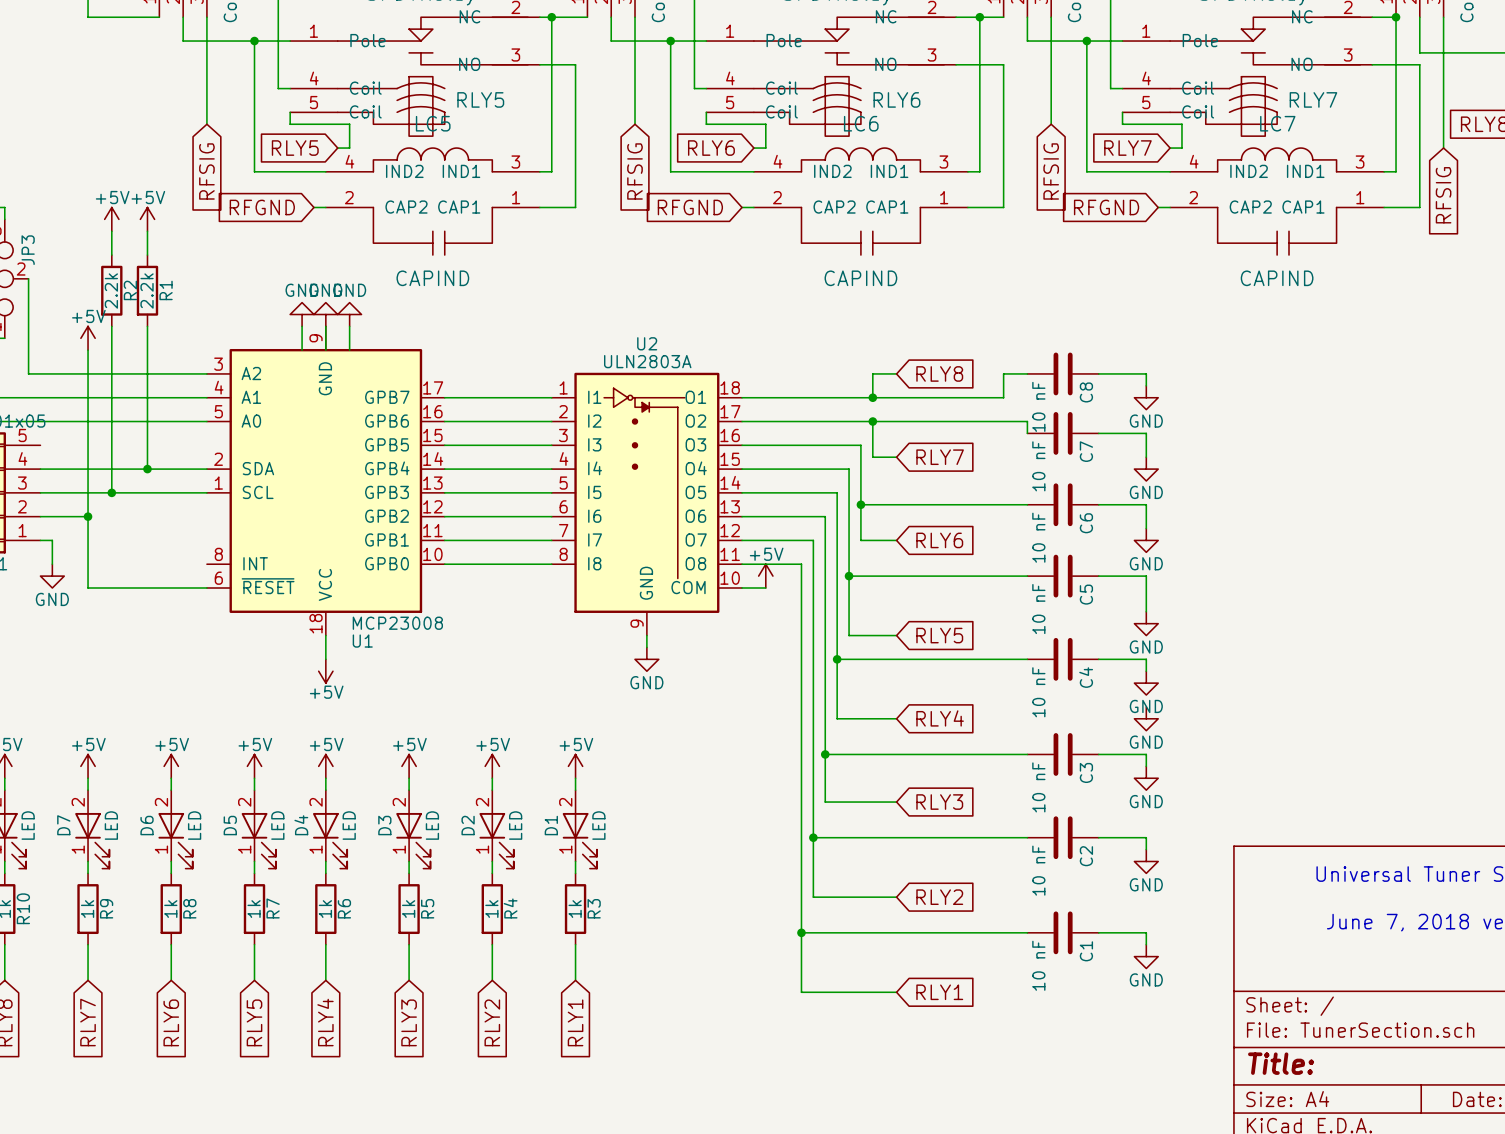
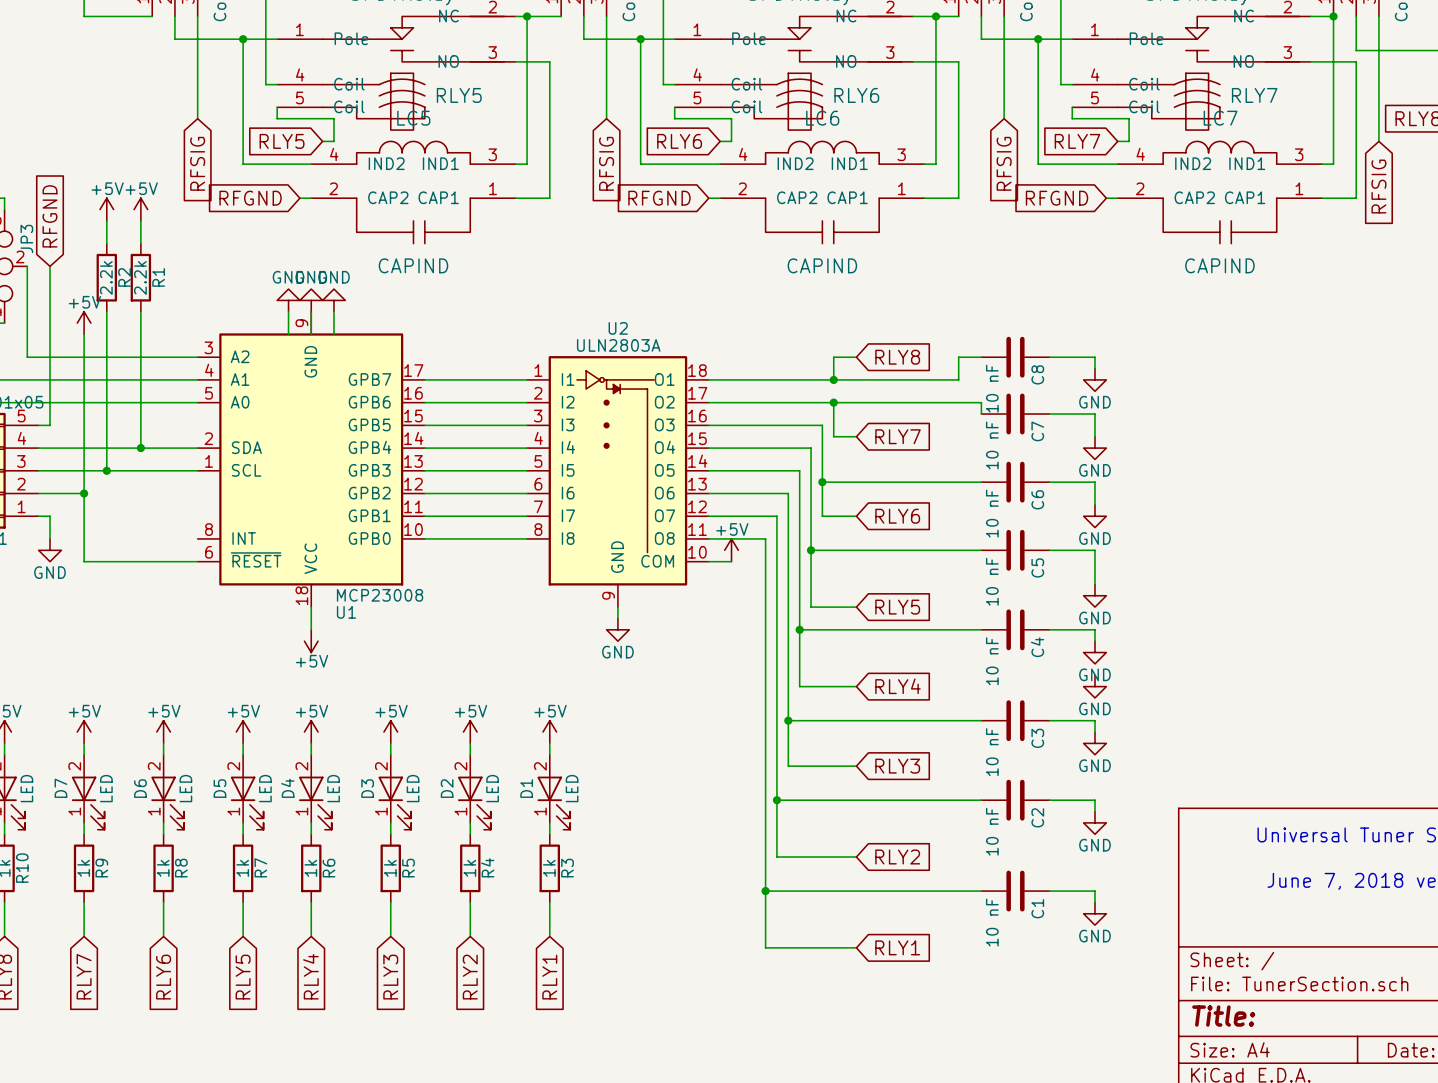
global label: none -> RFGND (50, 216)
wire: none -> (50, 266) (50, 425) (38, 425)

